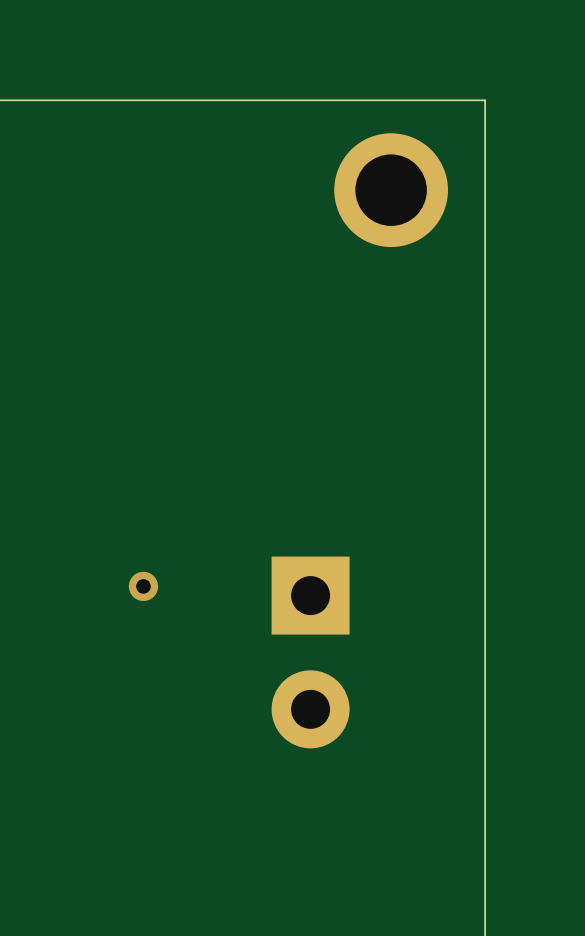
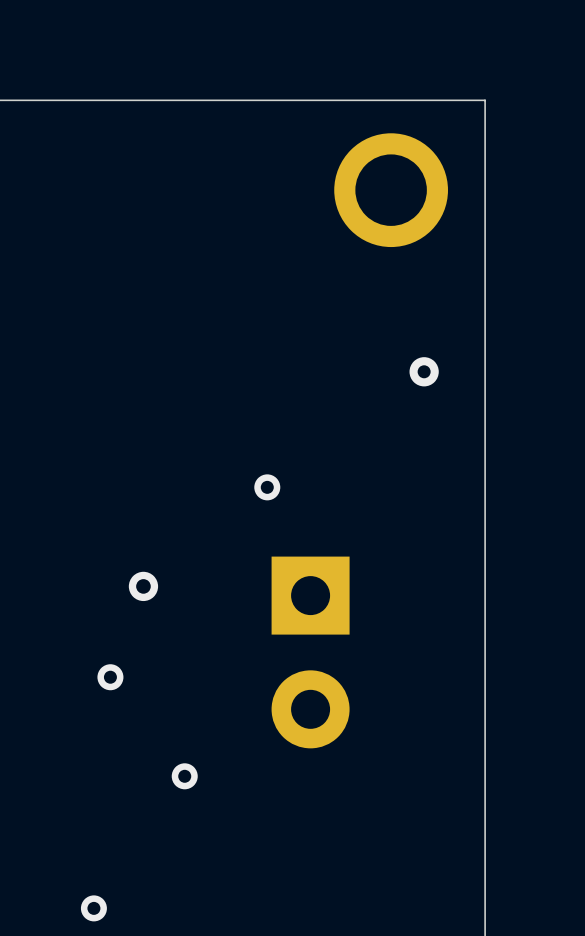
via: none -> (424, 371)
via: none -> (267, 487)
via: none -> (110, 677)
via: none -> (184, 776)
via: none -> (93, 908)

